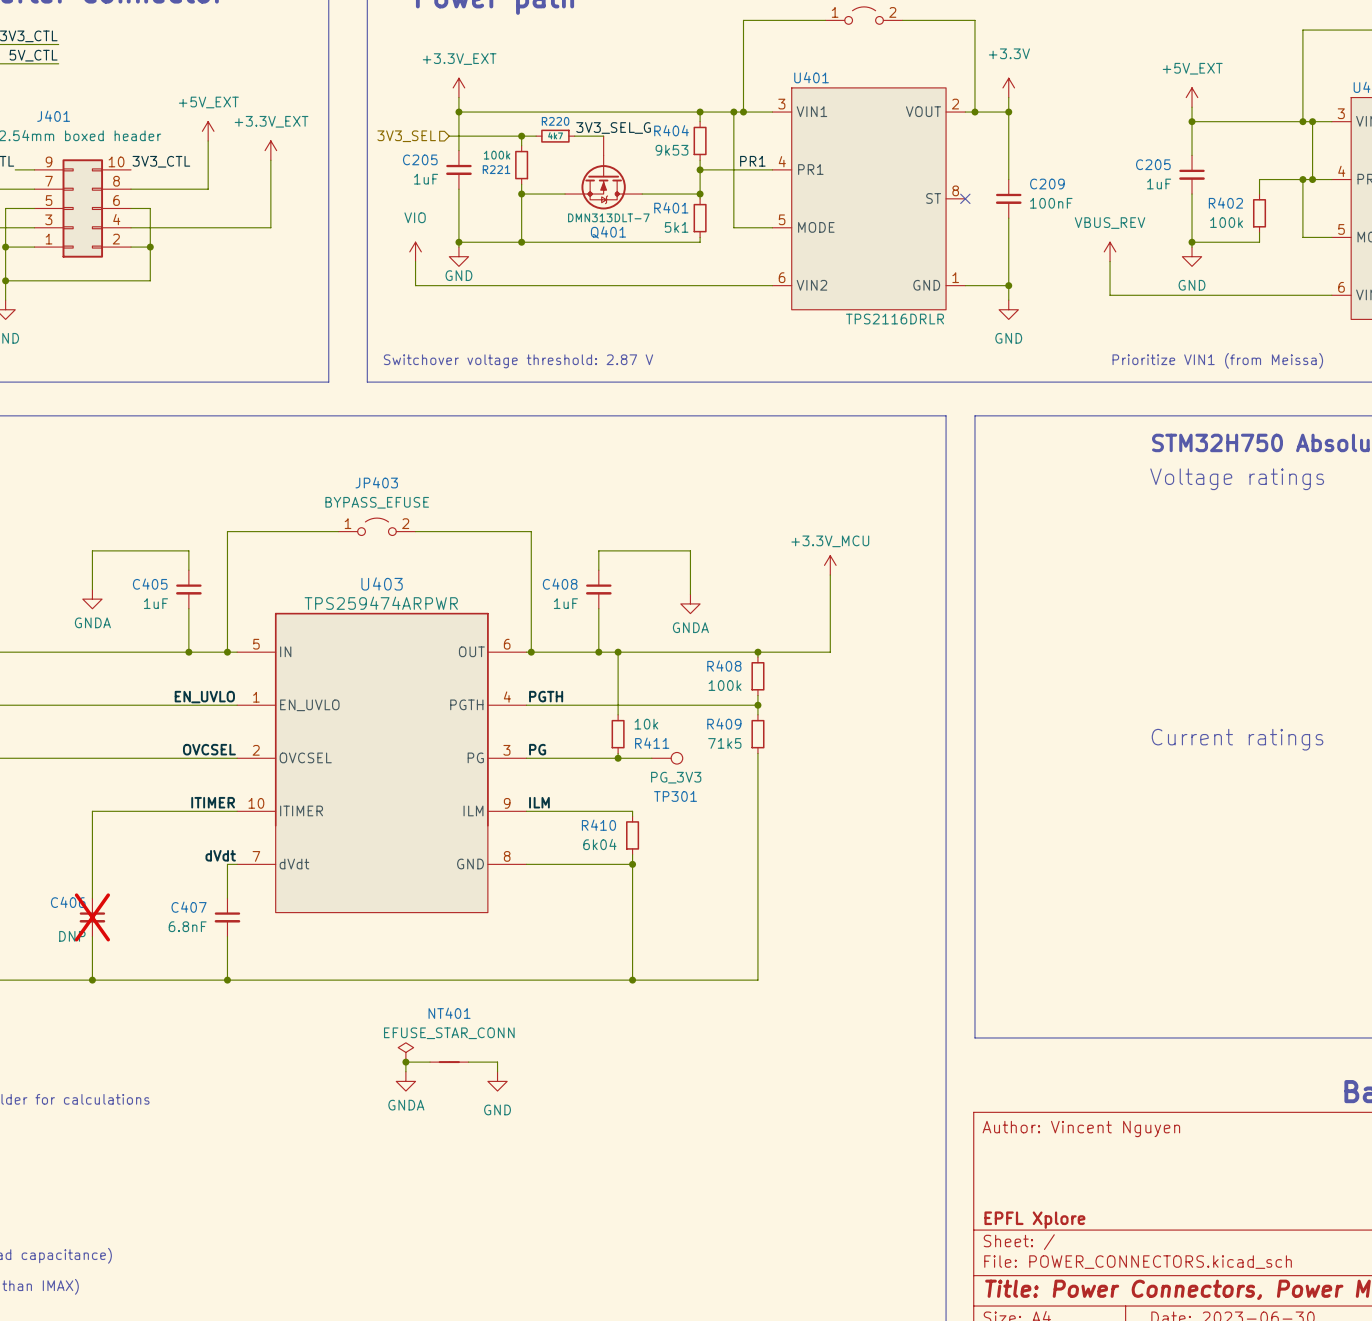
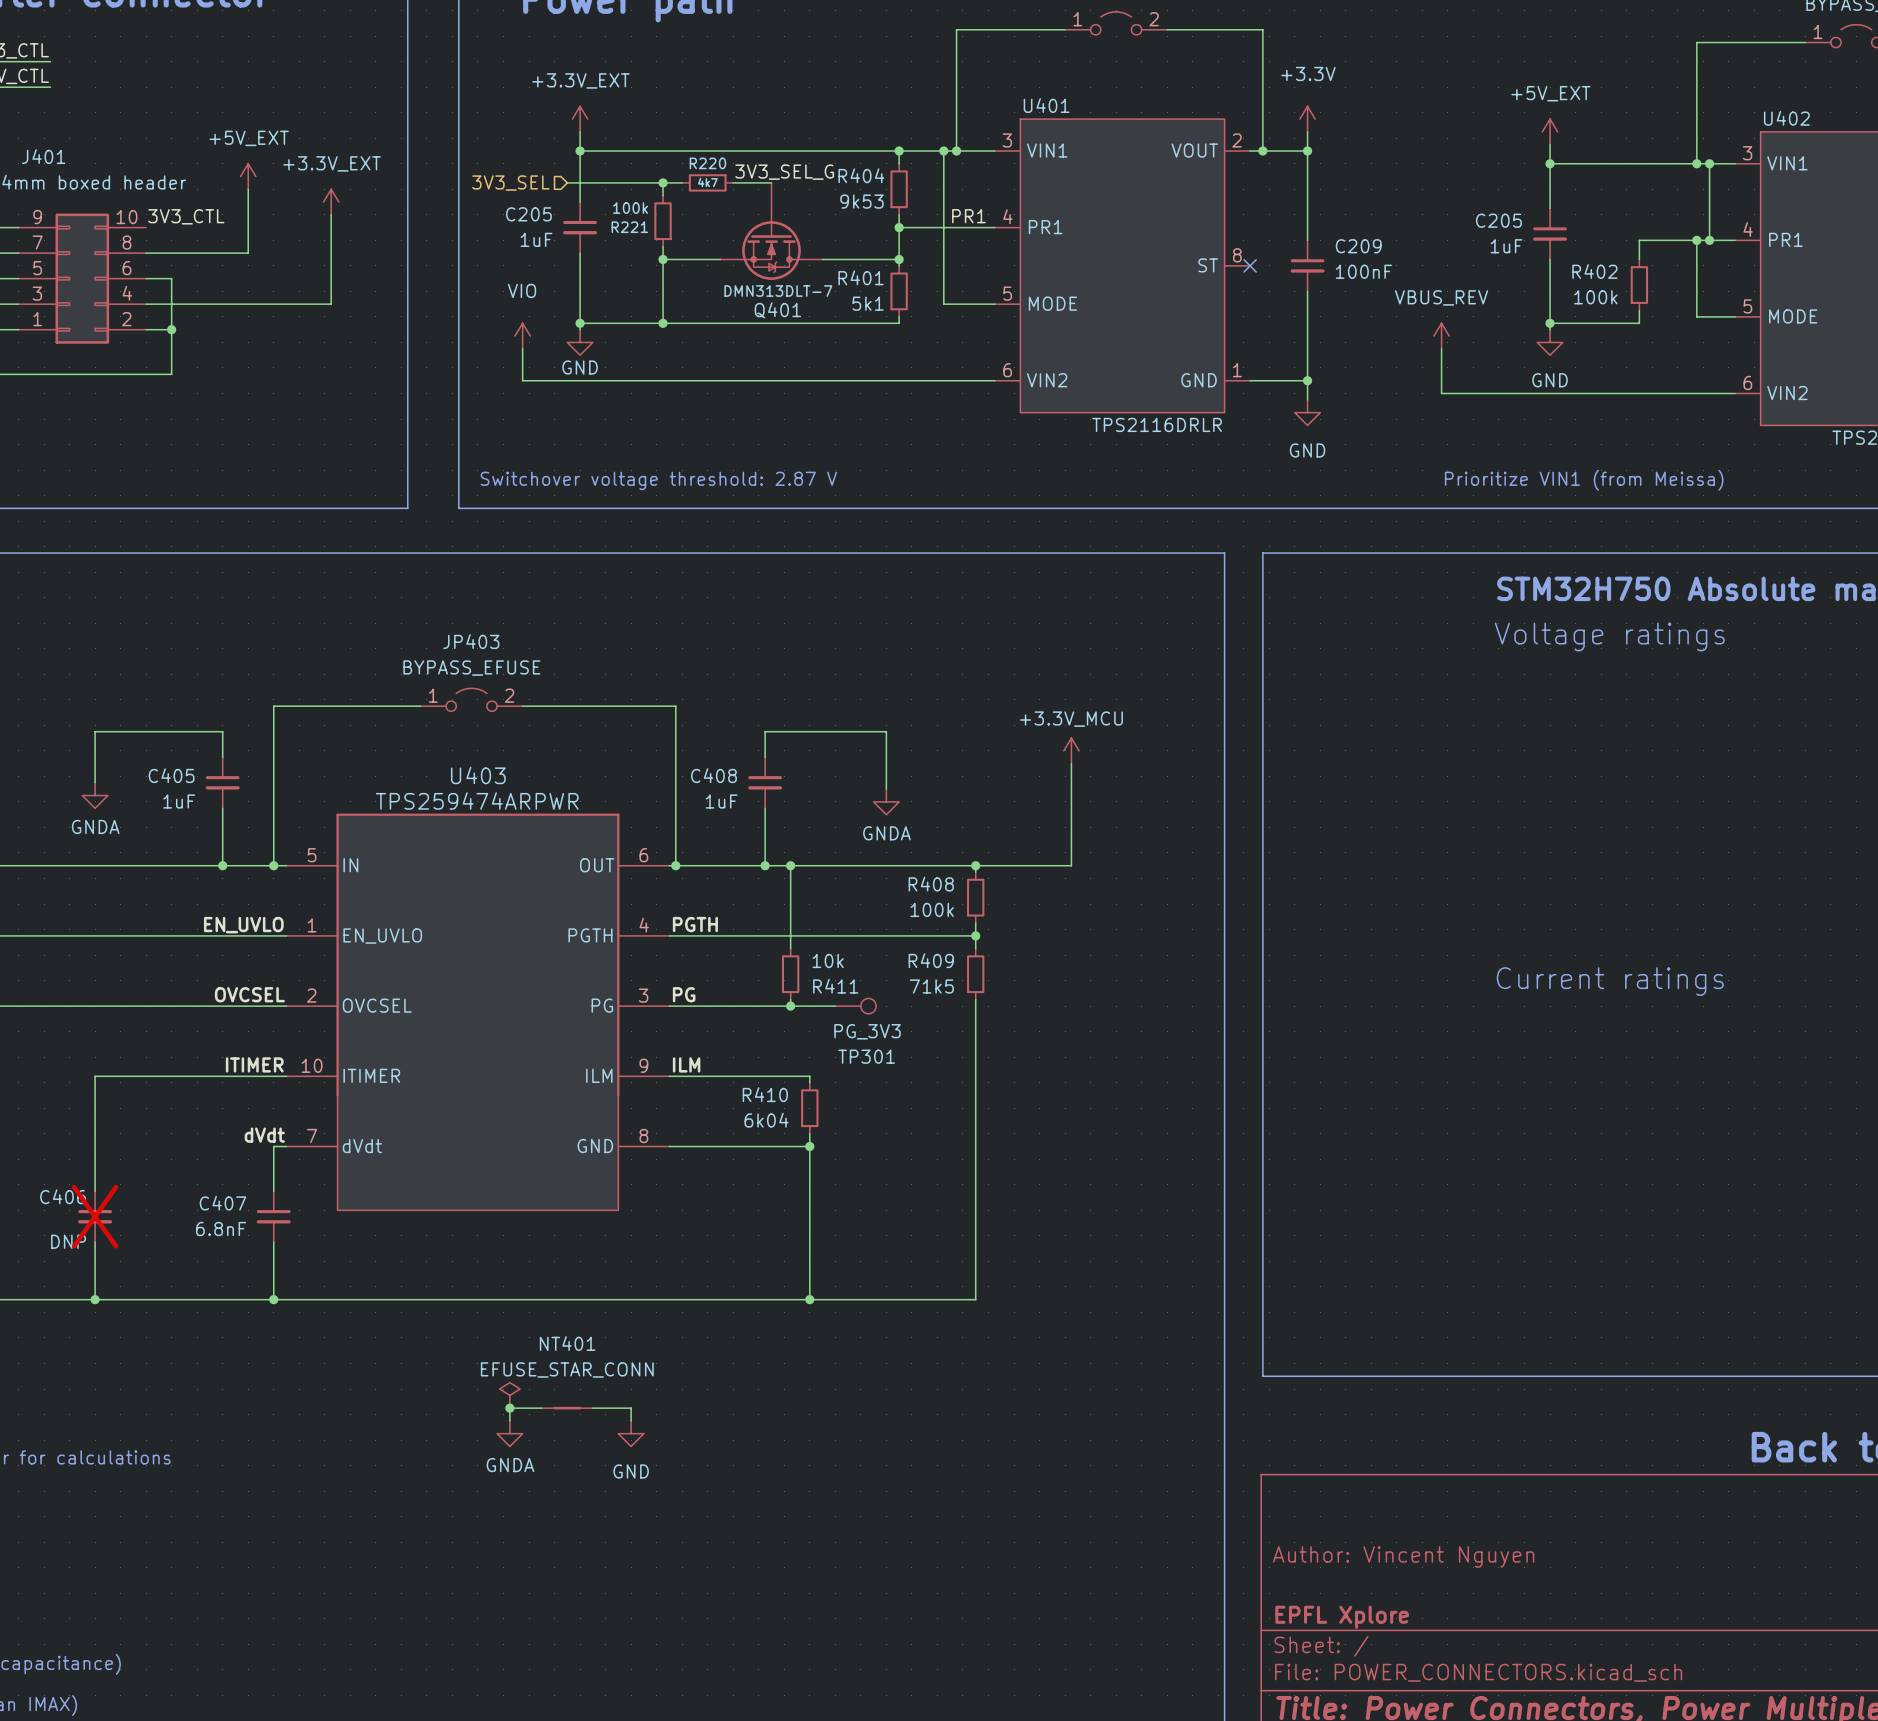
title block position: Author: Vincent Nguyen (1081, 1129) -> Author: Vincent Nguyen (1403, 1556)

